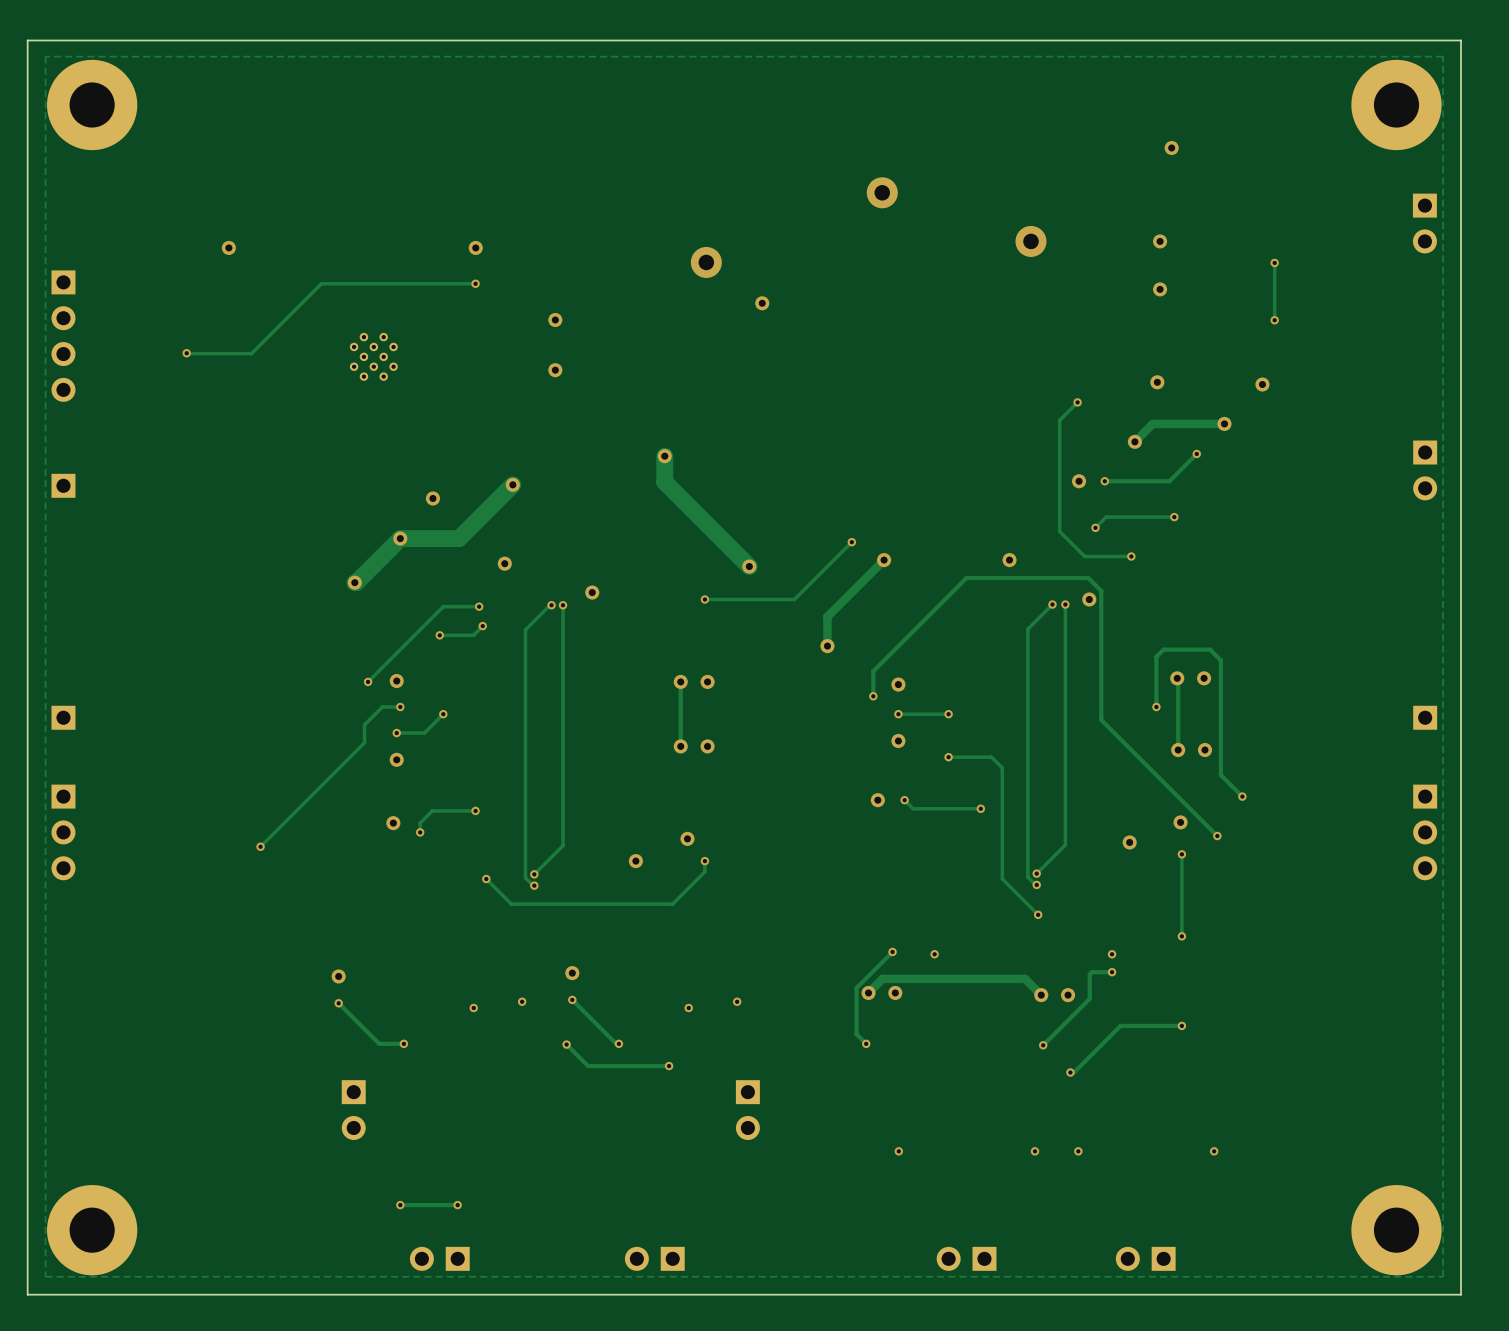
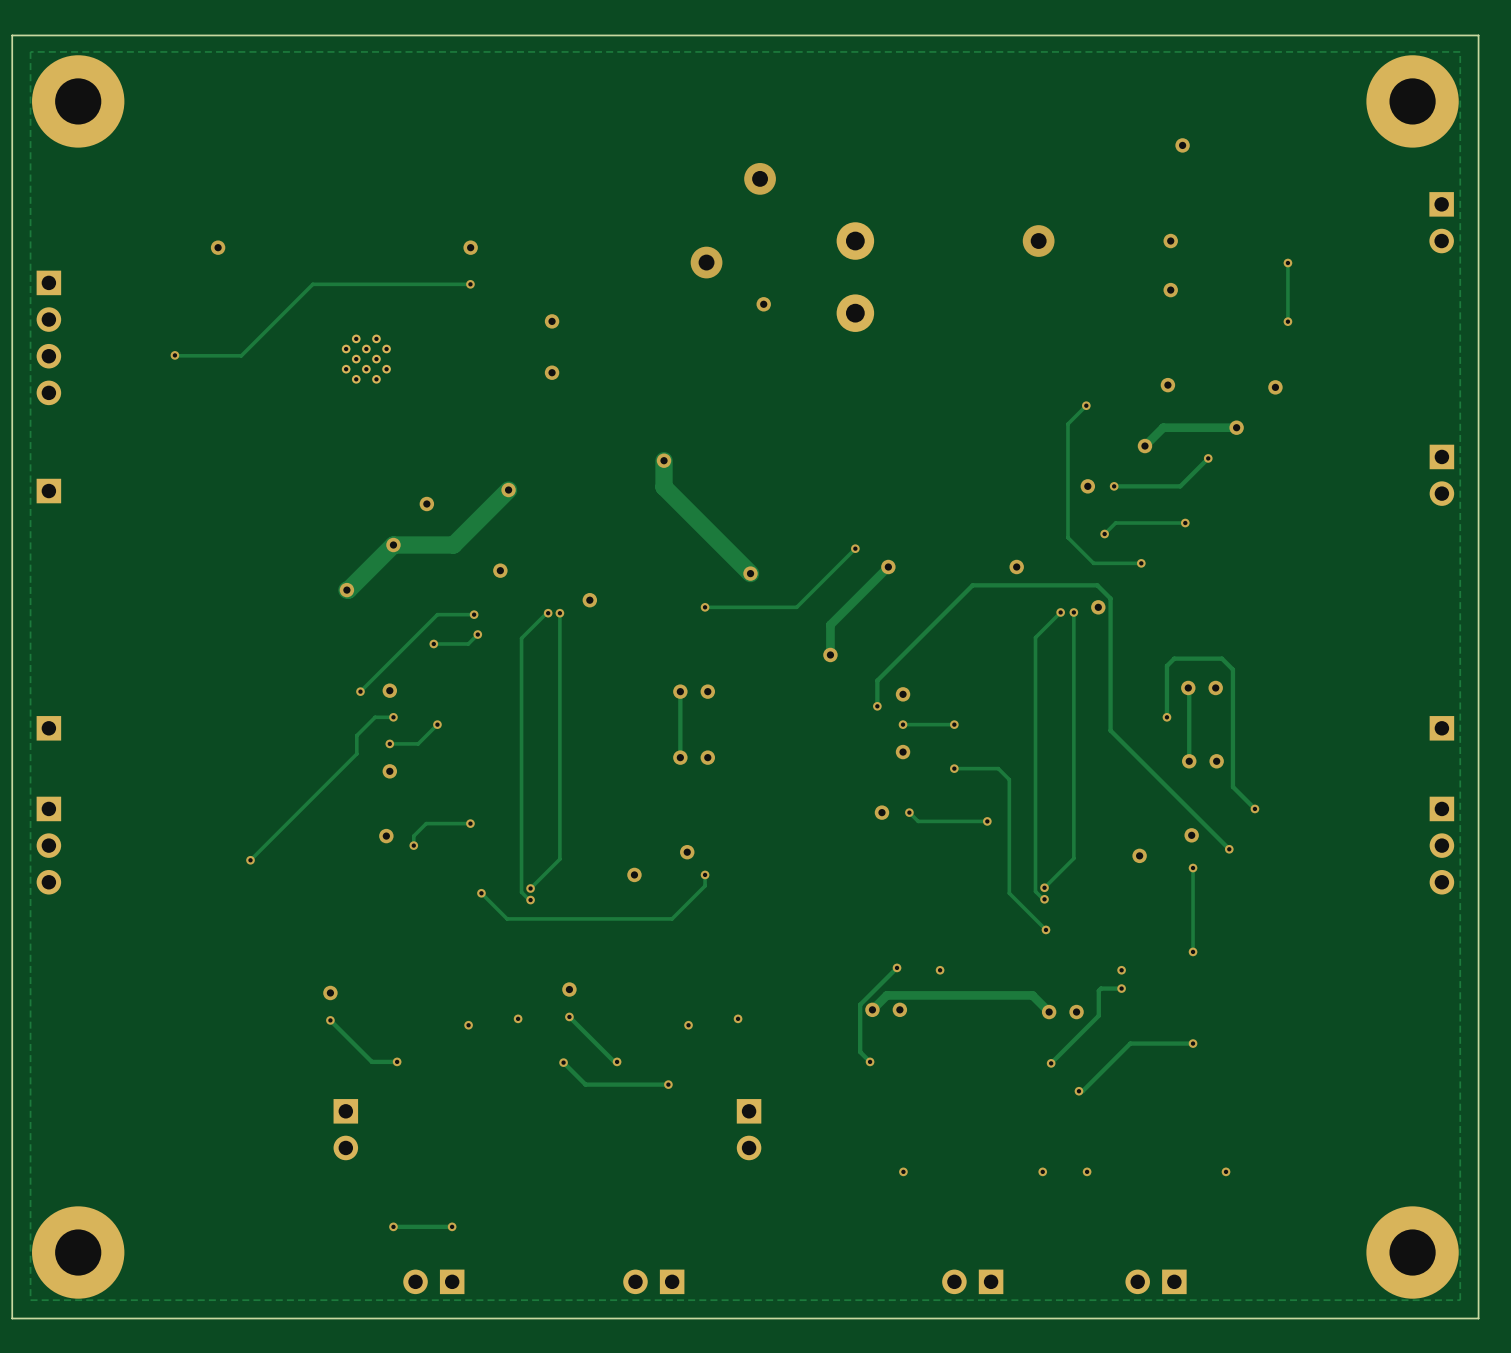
via: none -> (760, 178)
via: (882, 192) -> none
part: none -> (855, 277)

